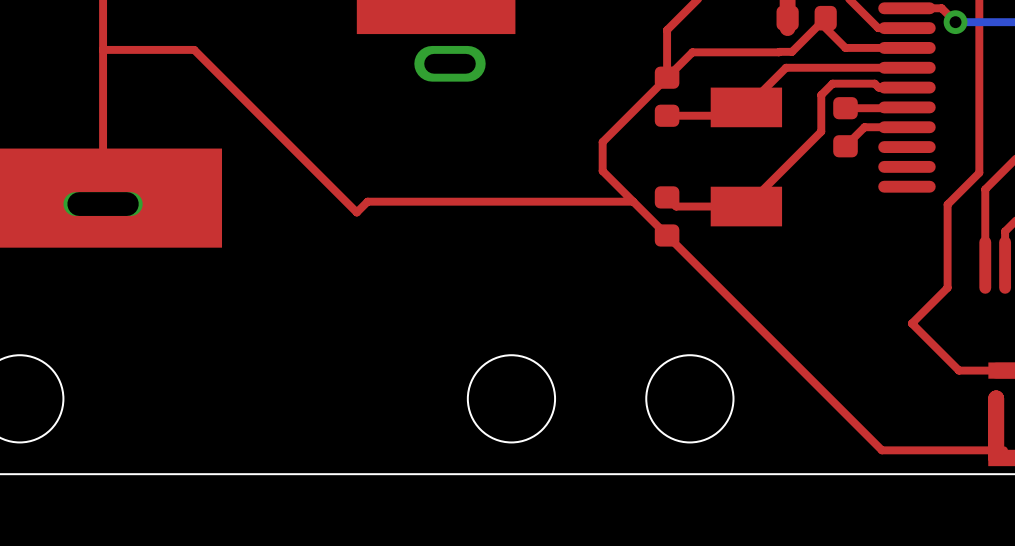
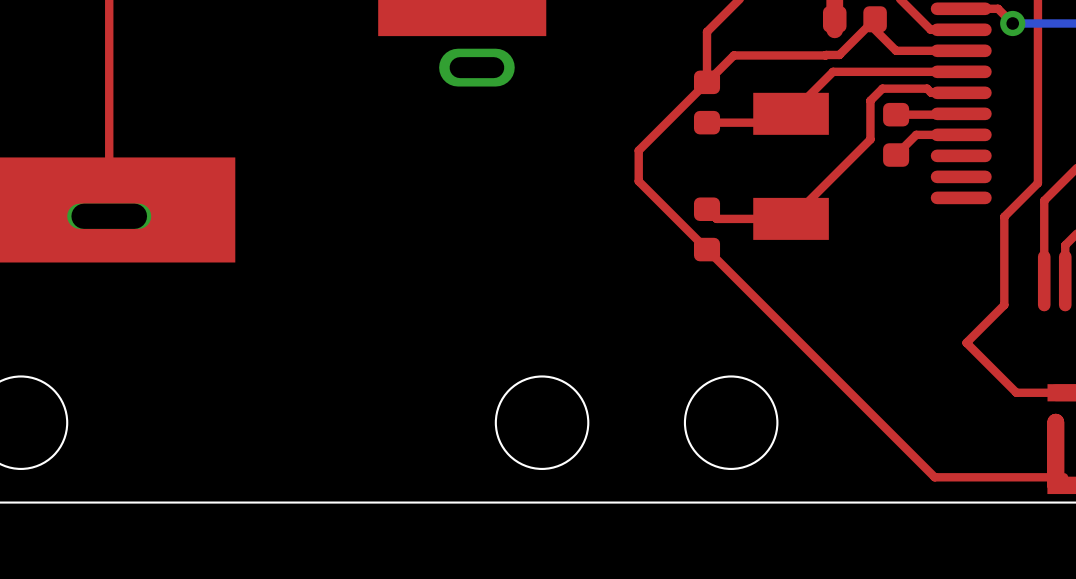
top track: (103, 49) (194, 49) (356, 212) (367, 201) (633, 201) -> none

